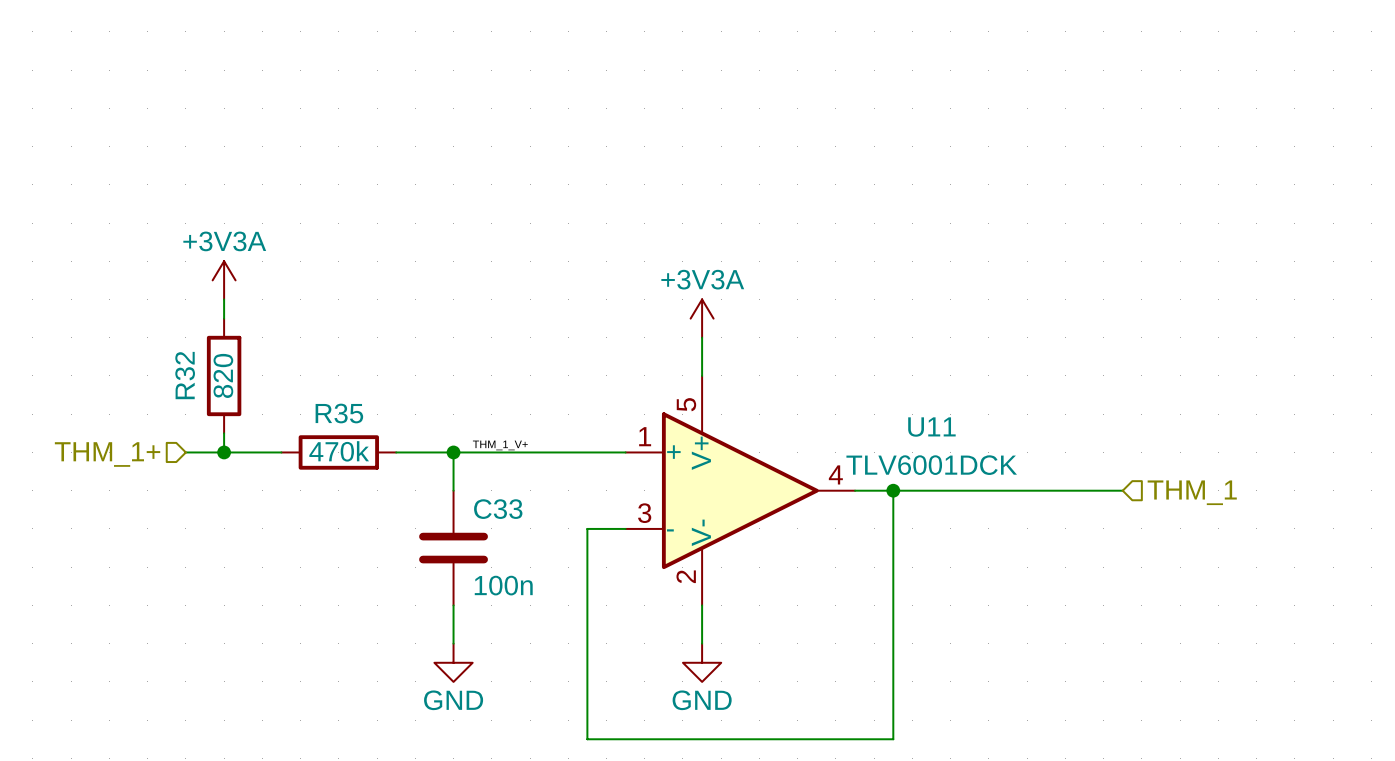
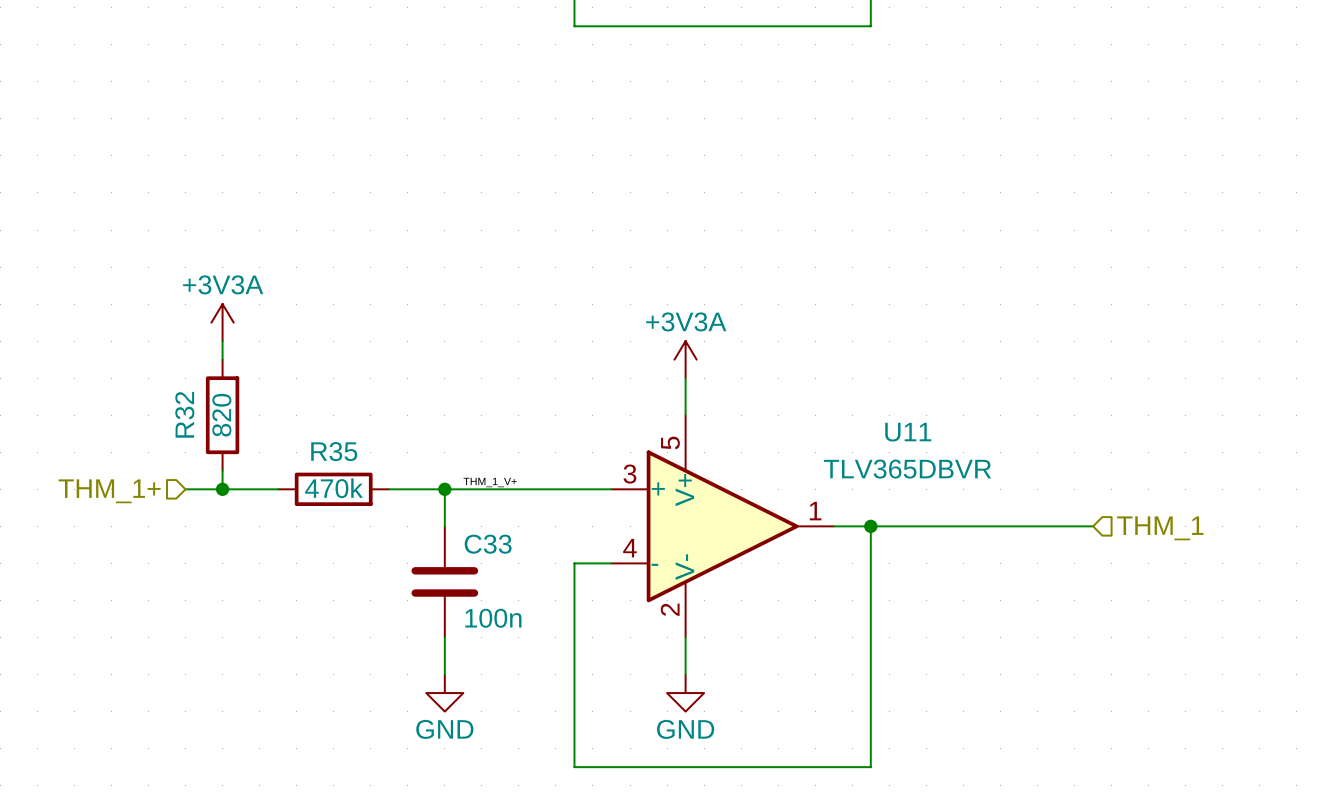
U11 name position: U11 (931, 427) -> U11 (908, 432)
U11 pin number: 1 (645, 436) -> 3 (629, 474)
U11 value: TLV6001DCK (931, 465) -> TLV365DBVR (907, 469)
U11 pin number: 4 (835, 474) -> 1 (815, 511)
U11 pin number: 3 (644, 513) -> 4 (629, 548)

